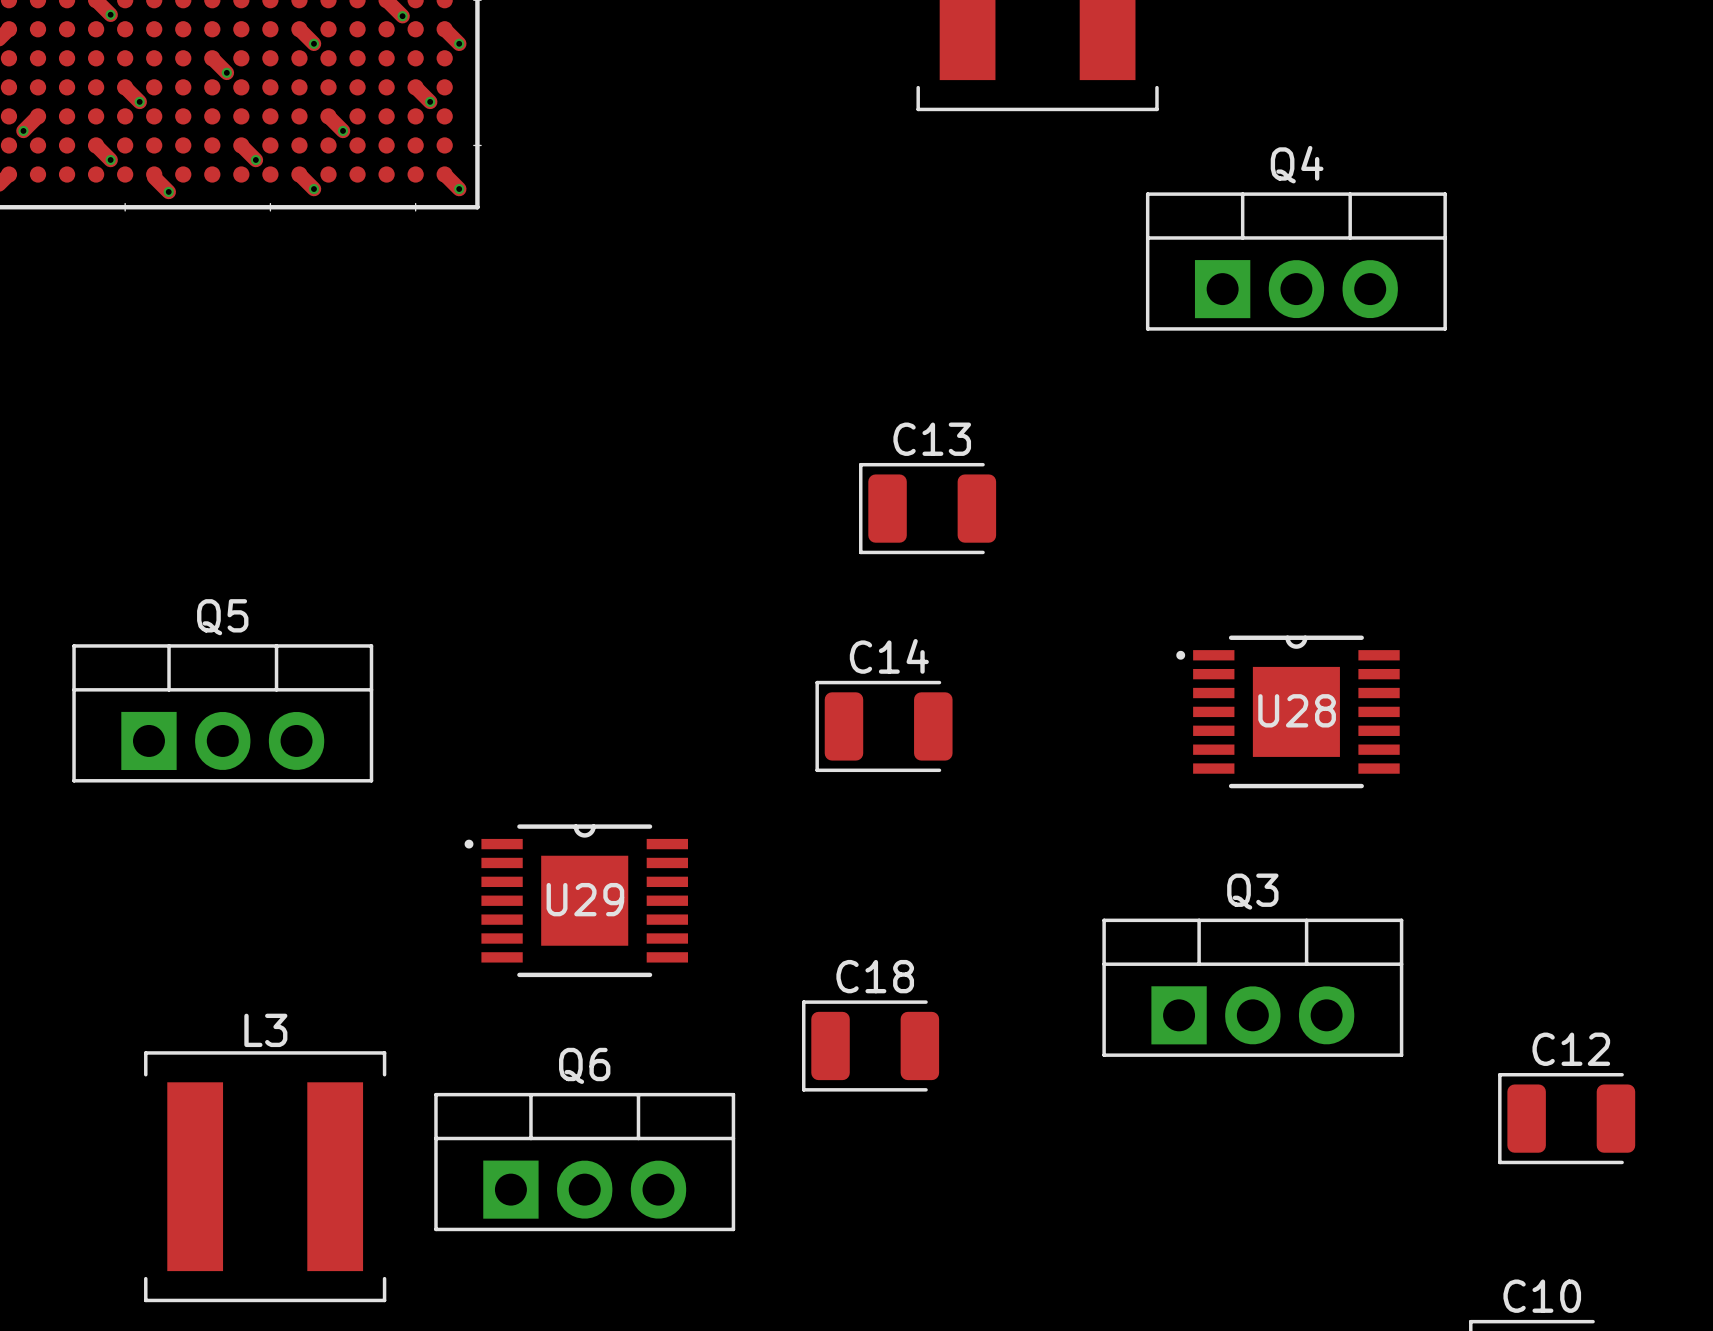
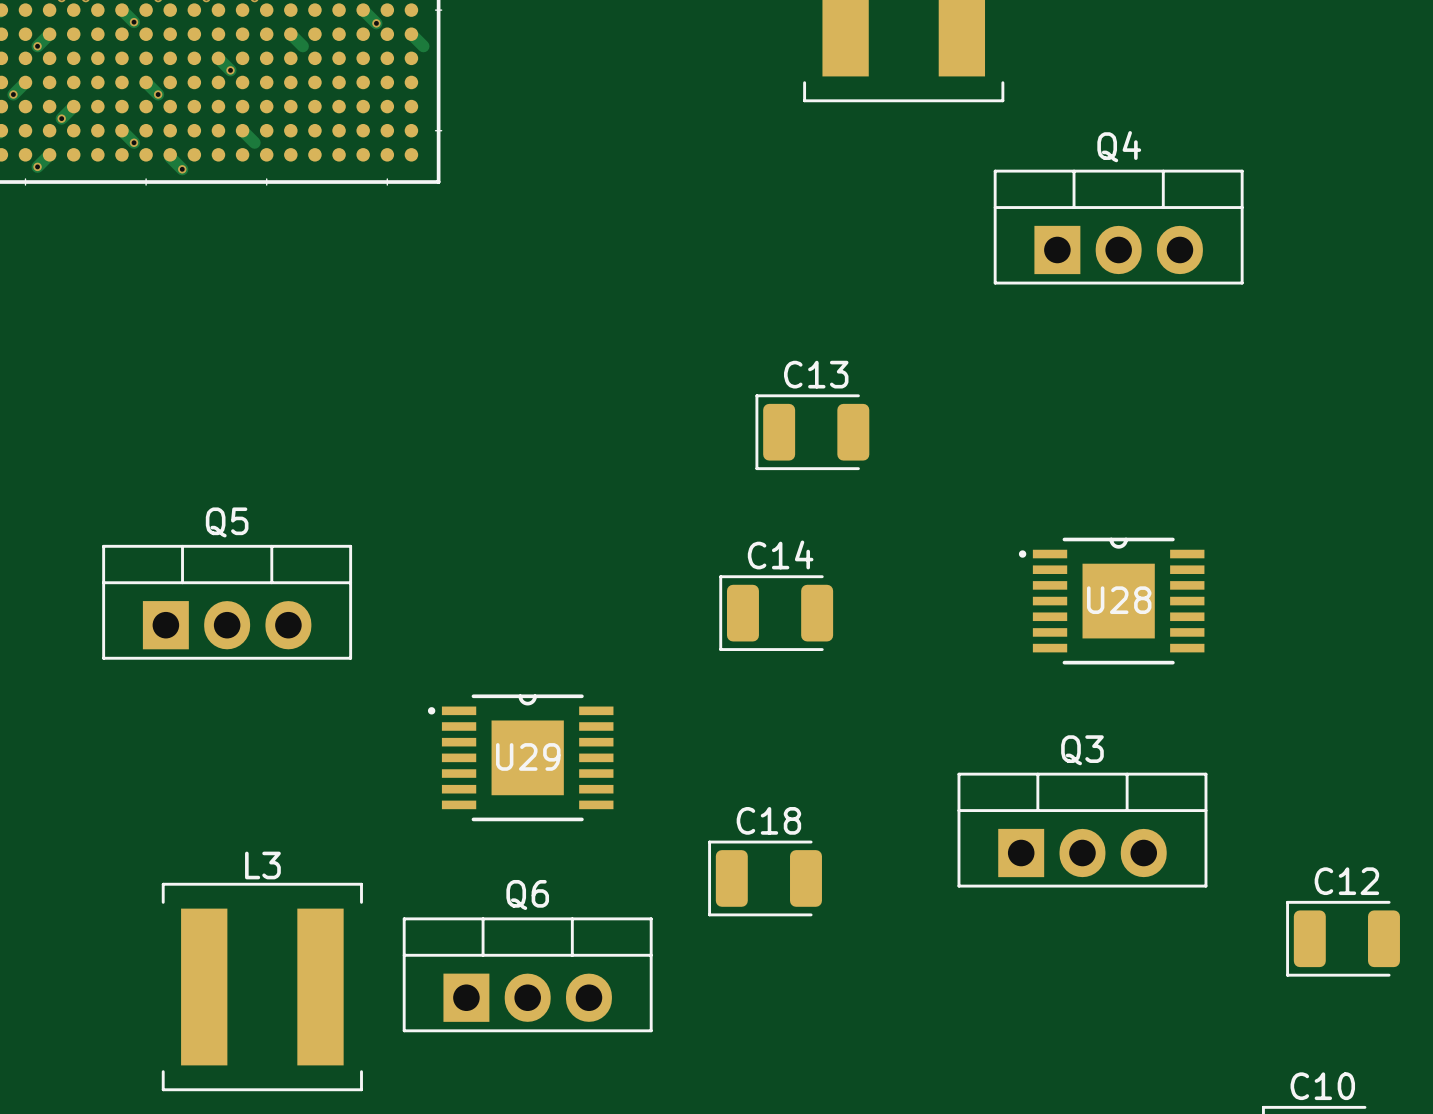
via: (313, 43) -> none
via: (459, 43) -> none
track: (415, 87) (430, 101) -> none
via: (430, 101) -> none
track: (328, 116) (343, 130) -> none
via: (343, 130) -> none
via: (255, 159) -> none
track: (299, 174) (313, 189) -> none
track: (444, 174) (459, 189) -> none
via: (313, 189) -> none
via: (459, 189) -> none

